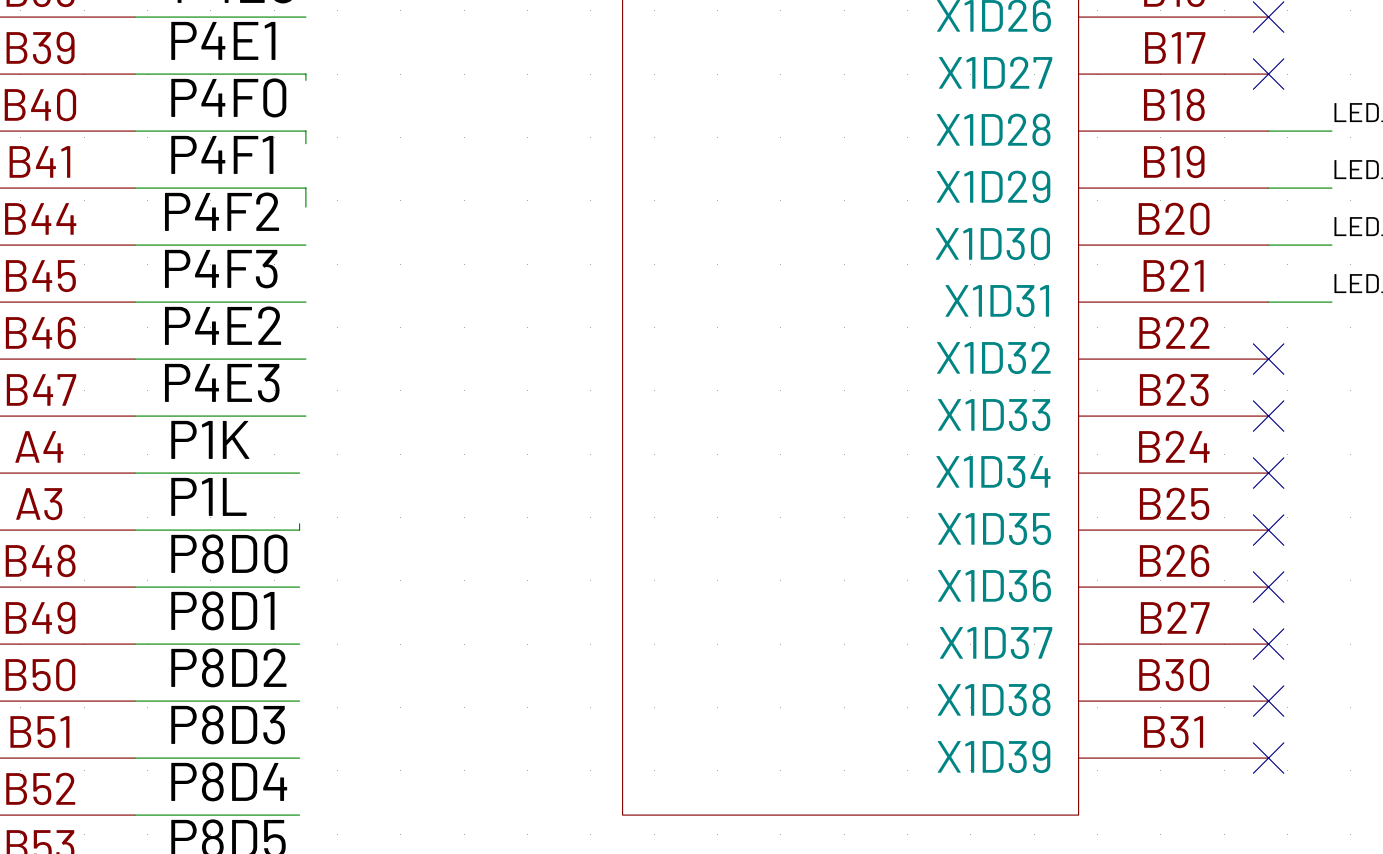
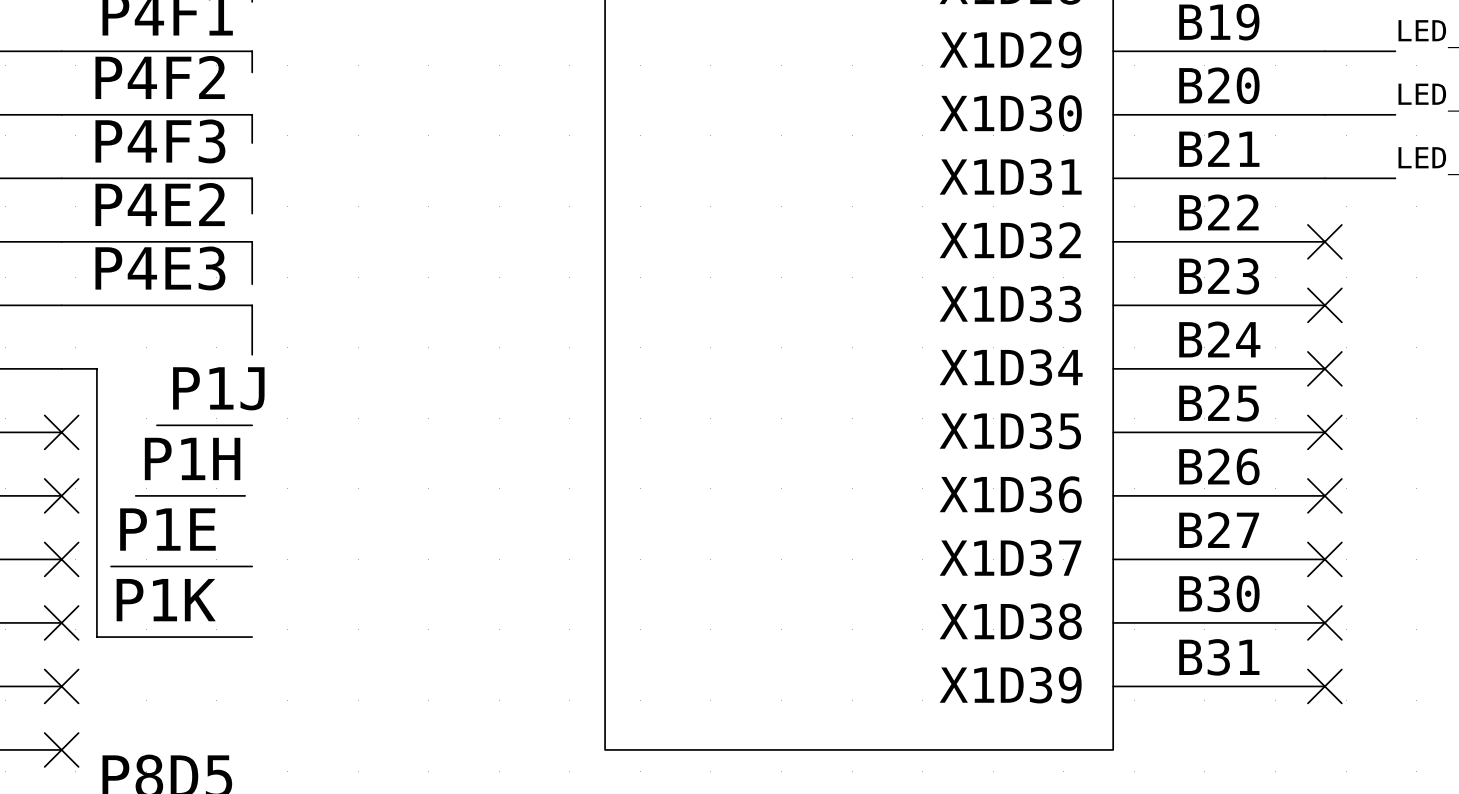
wire: none -> (252, 114) (252, 143)
wire: none -> (252, 178) (252, 213)
wire: none -> (252, 241) (252, 284)
wire: none -> (252, 305) (252, 354)
label position: P1K (210, 439) -> P1K (166, 600)
wire: (166, 473) (299, 473) -> (96, 368) (96, 637) (252, 637)
label: none -> P1J (218, 388)
label: P1L (208, 496) -> none
wire: none -> (156, 425) (252, 425)
wire: (299, 523) (299, 530) (134, 530) -> none
no-connect mark: none -> (61, 432)
label: P8D0 (229, 553) -> none
label: none -> P1H (192, 458)
wire: (134, 587) (201, 587) -> none
no-connect mark: none -> (61, 495)
label: P8D1 (222, 610) -> P1E (167, 529)
wire: (134, 644) (299, 644) -> none
no-connect mark: none -> (61, 559)
wire: none -> (111, 566) (252, 566)
label: P8D2 (228, 667) -> none
wire: (134, 701) (299, 701) -> none
no-connect mark: none -> (61, 622)
label: P8D3 (228, 724) -> none
wire: (134, 758) (299, 758) -> none
no-connect mark: none -> (61, 686)
label: P8D4 (229, 781) -> none
wire: (134, 815) (299, 815) -> none
no-connect mark: none -> (61, 749)

